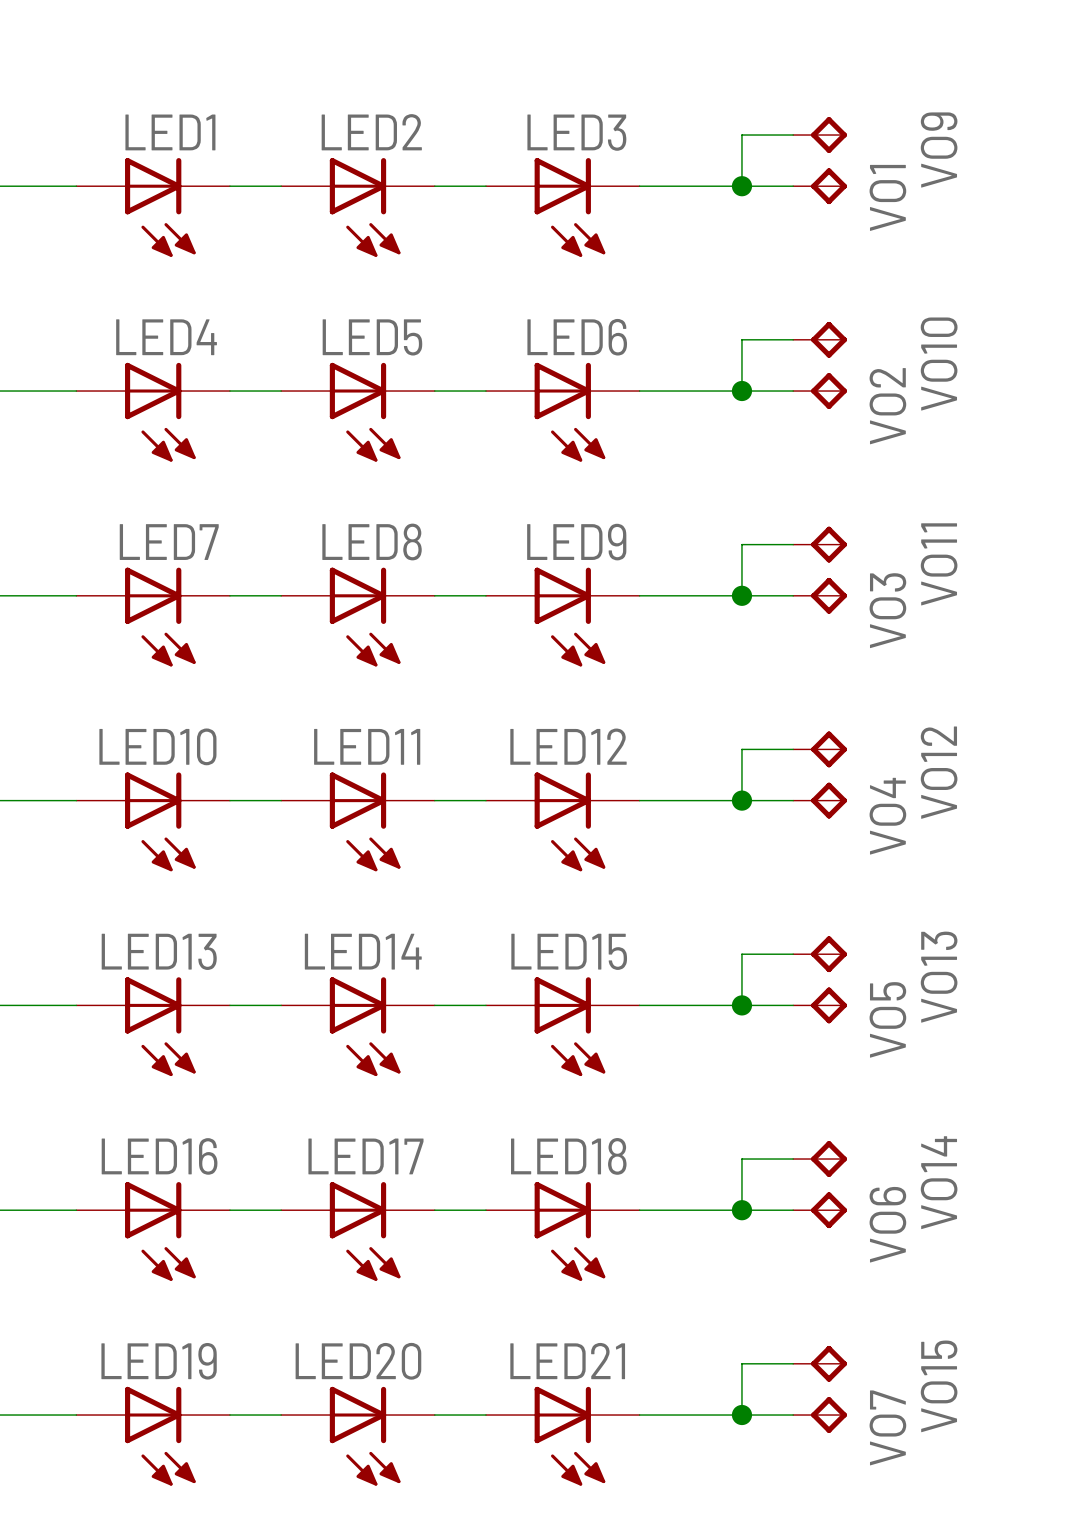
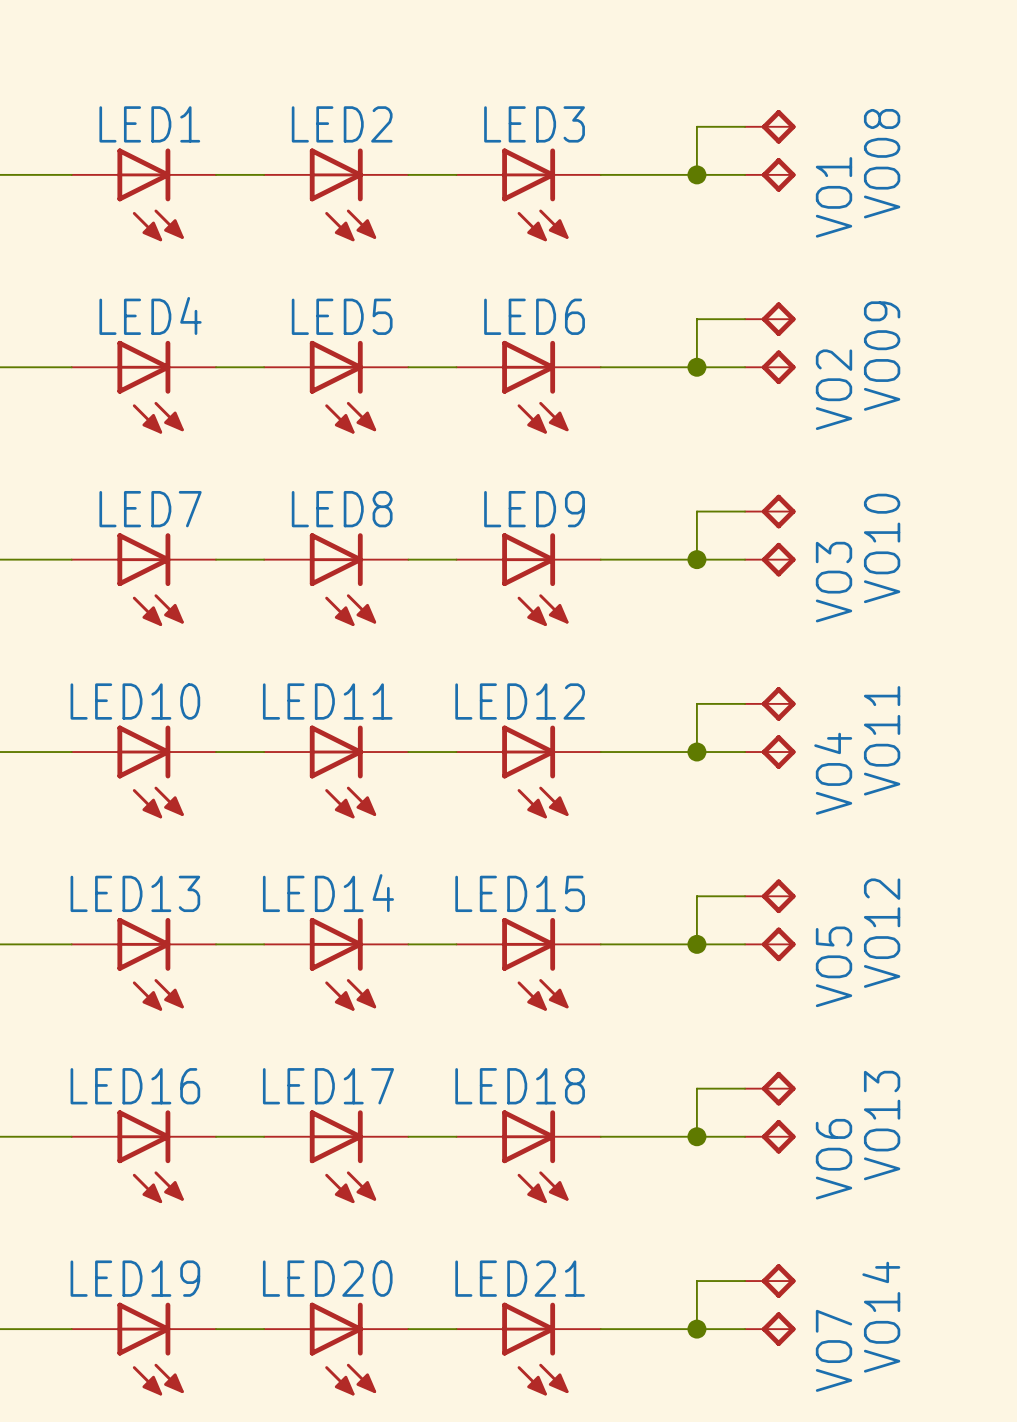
VO9 name: VO9 (939, 150) -> VO08 (882, 163)
VO10 name: VO10 (939, 364) -> VO09 (882, 356)
VO11 name: VO11 (939, 564) -> VO10 (882, 548)
VO12 name: VO12 (939, 772) -> VO11 (882, 740)
VO13 name: VO13 (939, 977) -> VO12 (882, 933)
VO14 name: VO14 (939, 1182) -> VO13 (882, 1125)
VO15 name: VO15 (939, 1386) -> VO14 (881, 1317)

